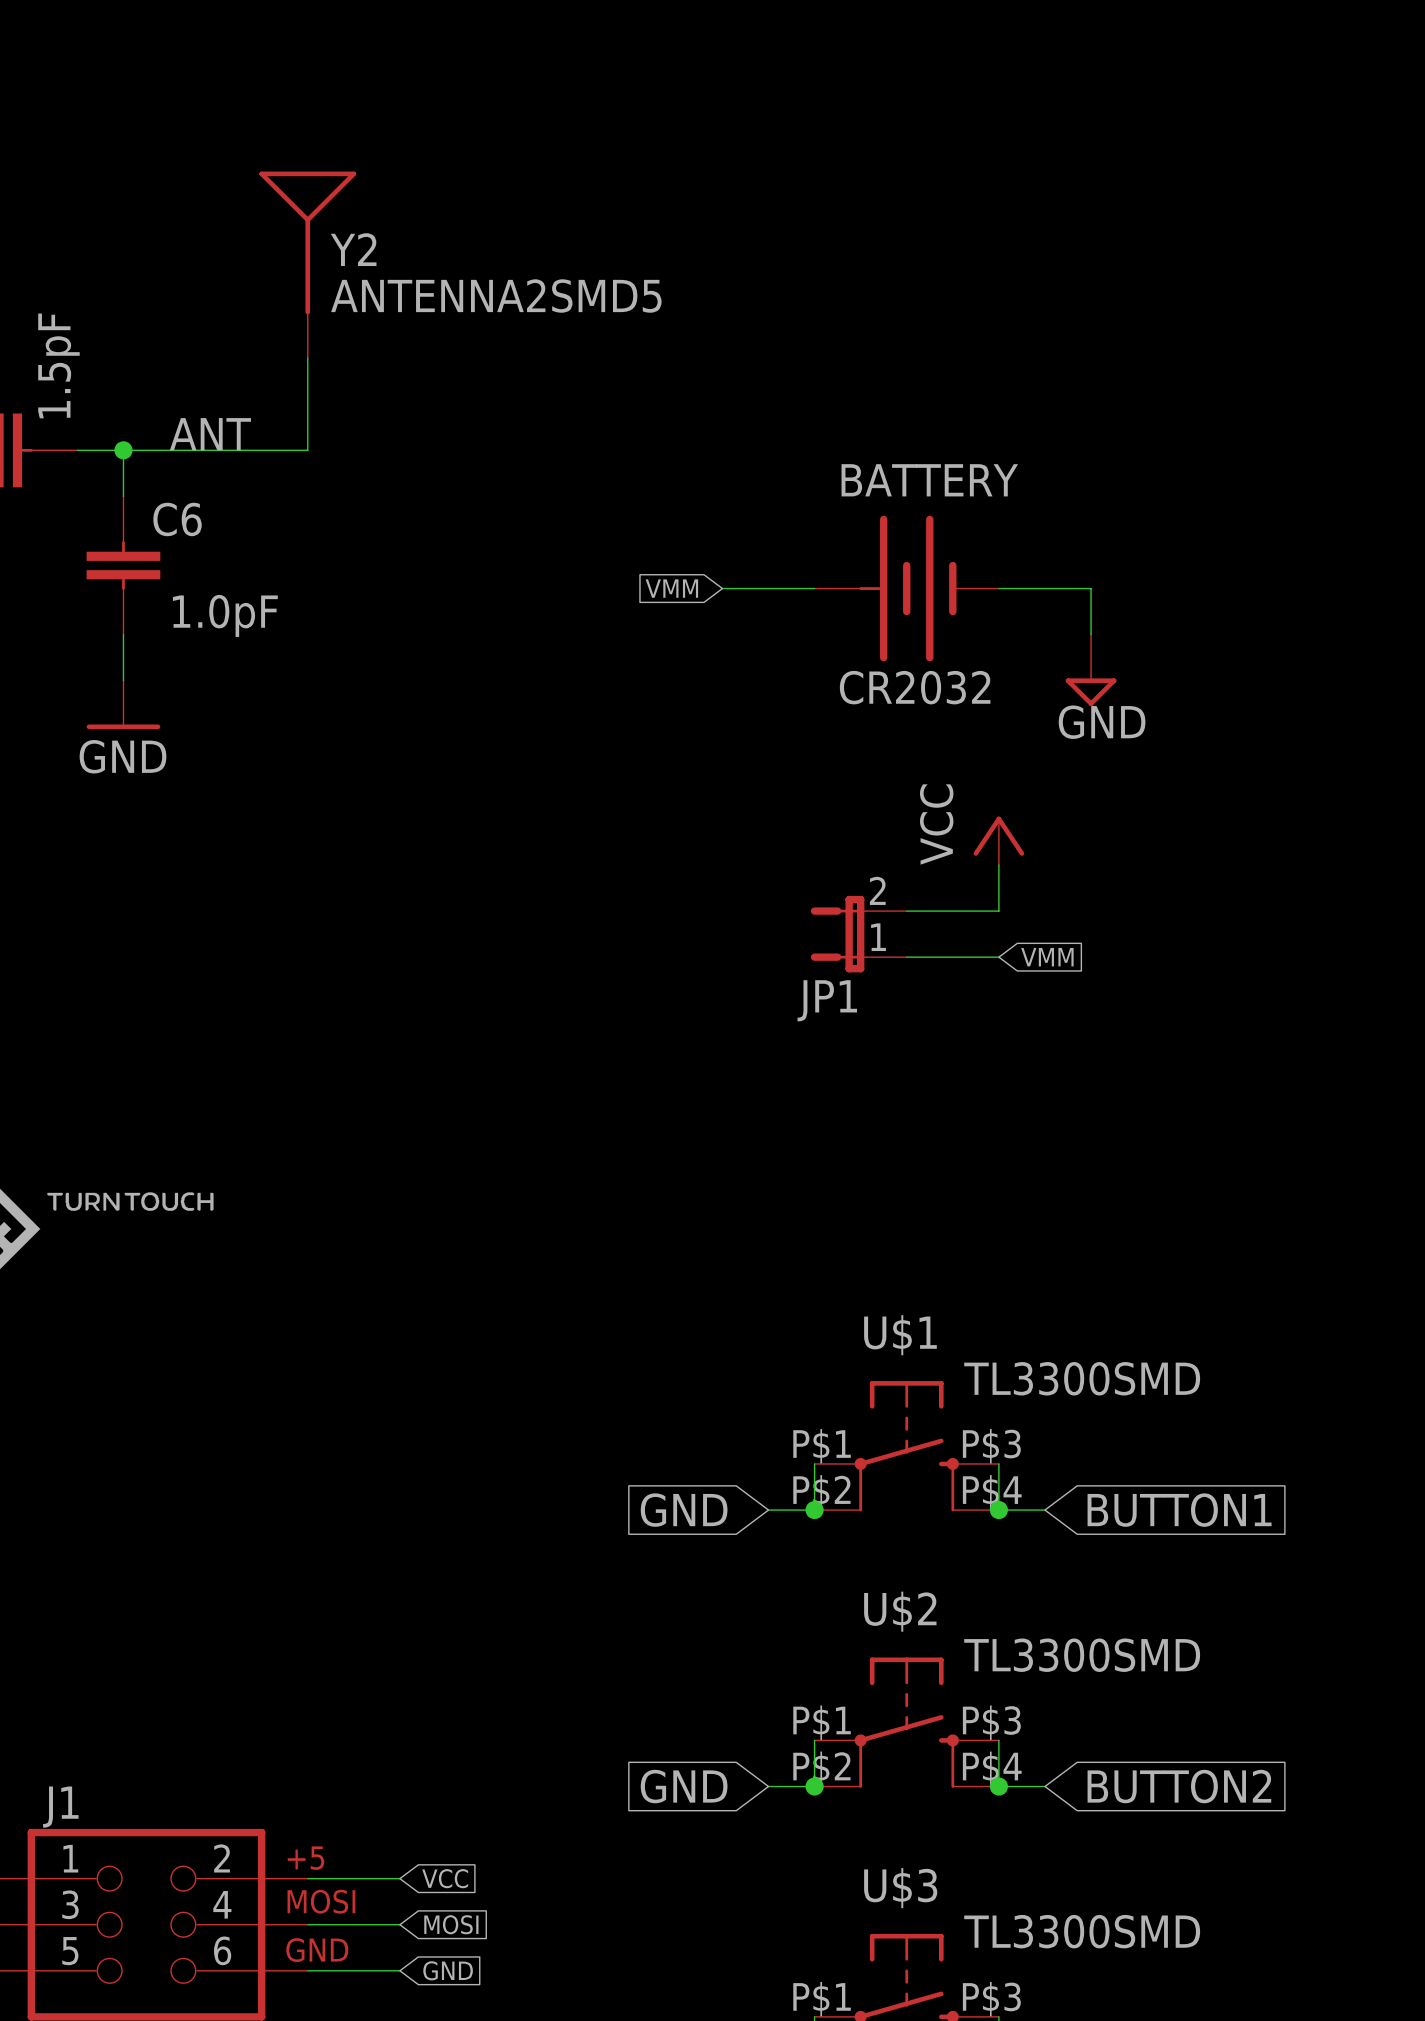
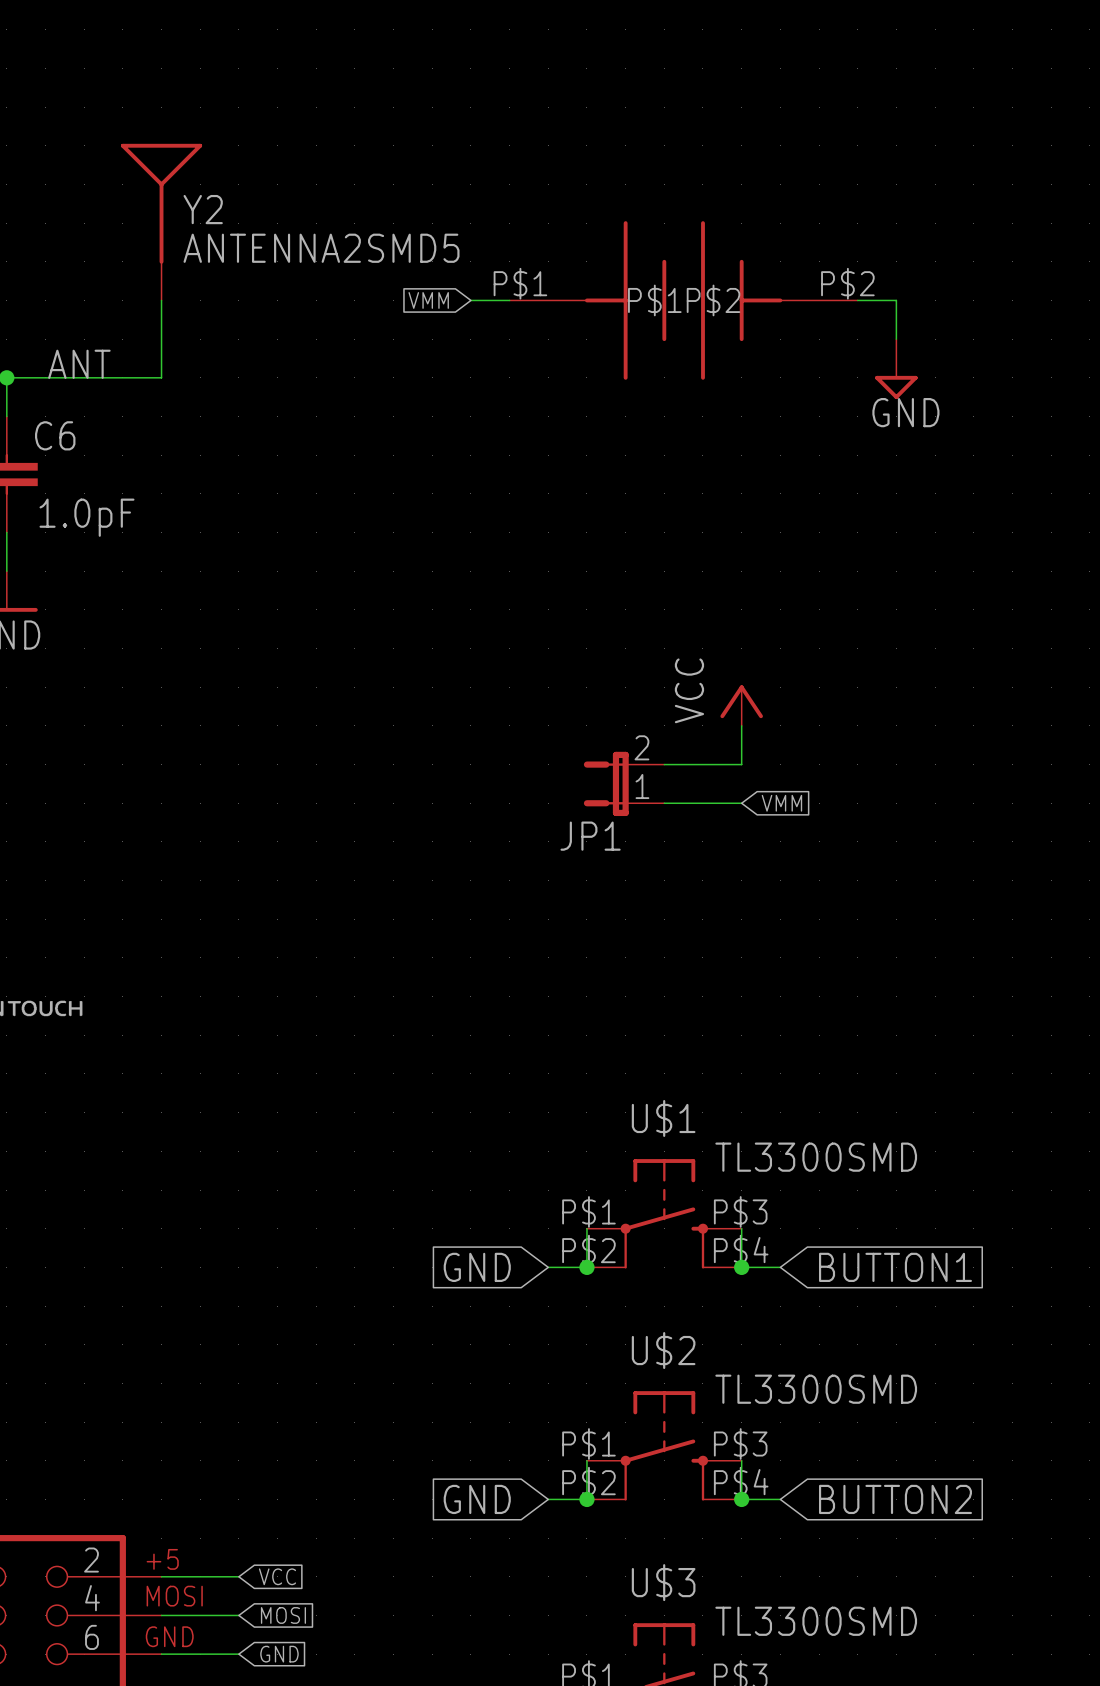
wire: none -> (470, 300) (509, 300)
part: none -> (683, 300)
wire: none -> (857, 300) (896, 300) (896, 339)
global label position: VMM (671, 588) -> VMM (428, 300)
wire: (722, 588) (814, 588) -> none
BATTERY: CR2032 (906, 588) -> none
wire: (998, 588) (1091, 588) (1091, 634) -> none
power symbol position: GND (1091, 670) -> GND (896, 369)

